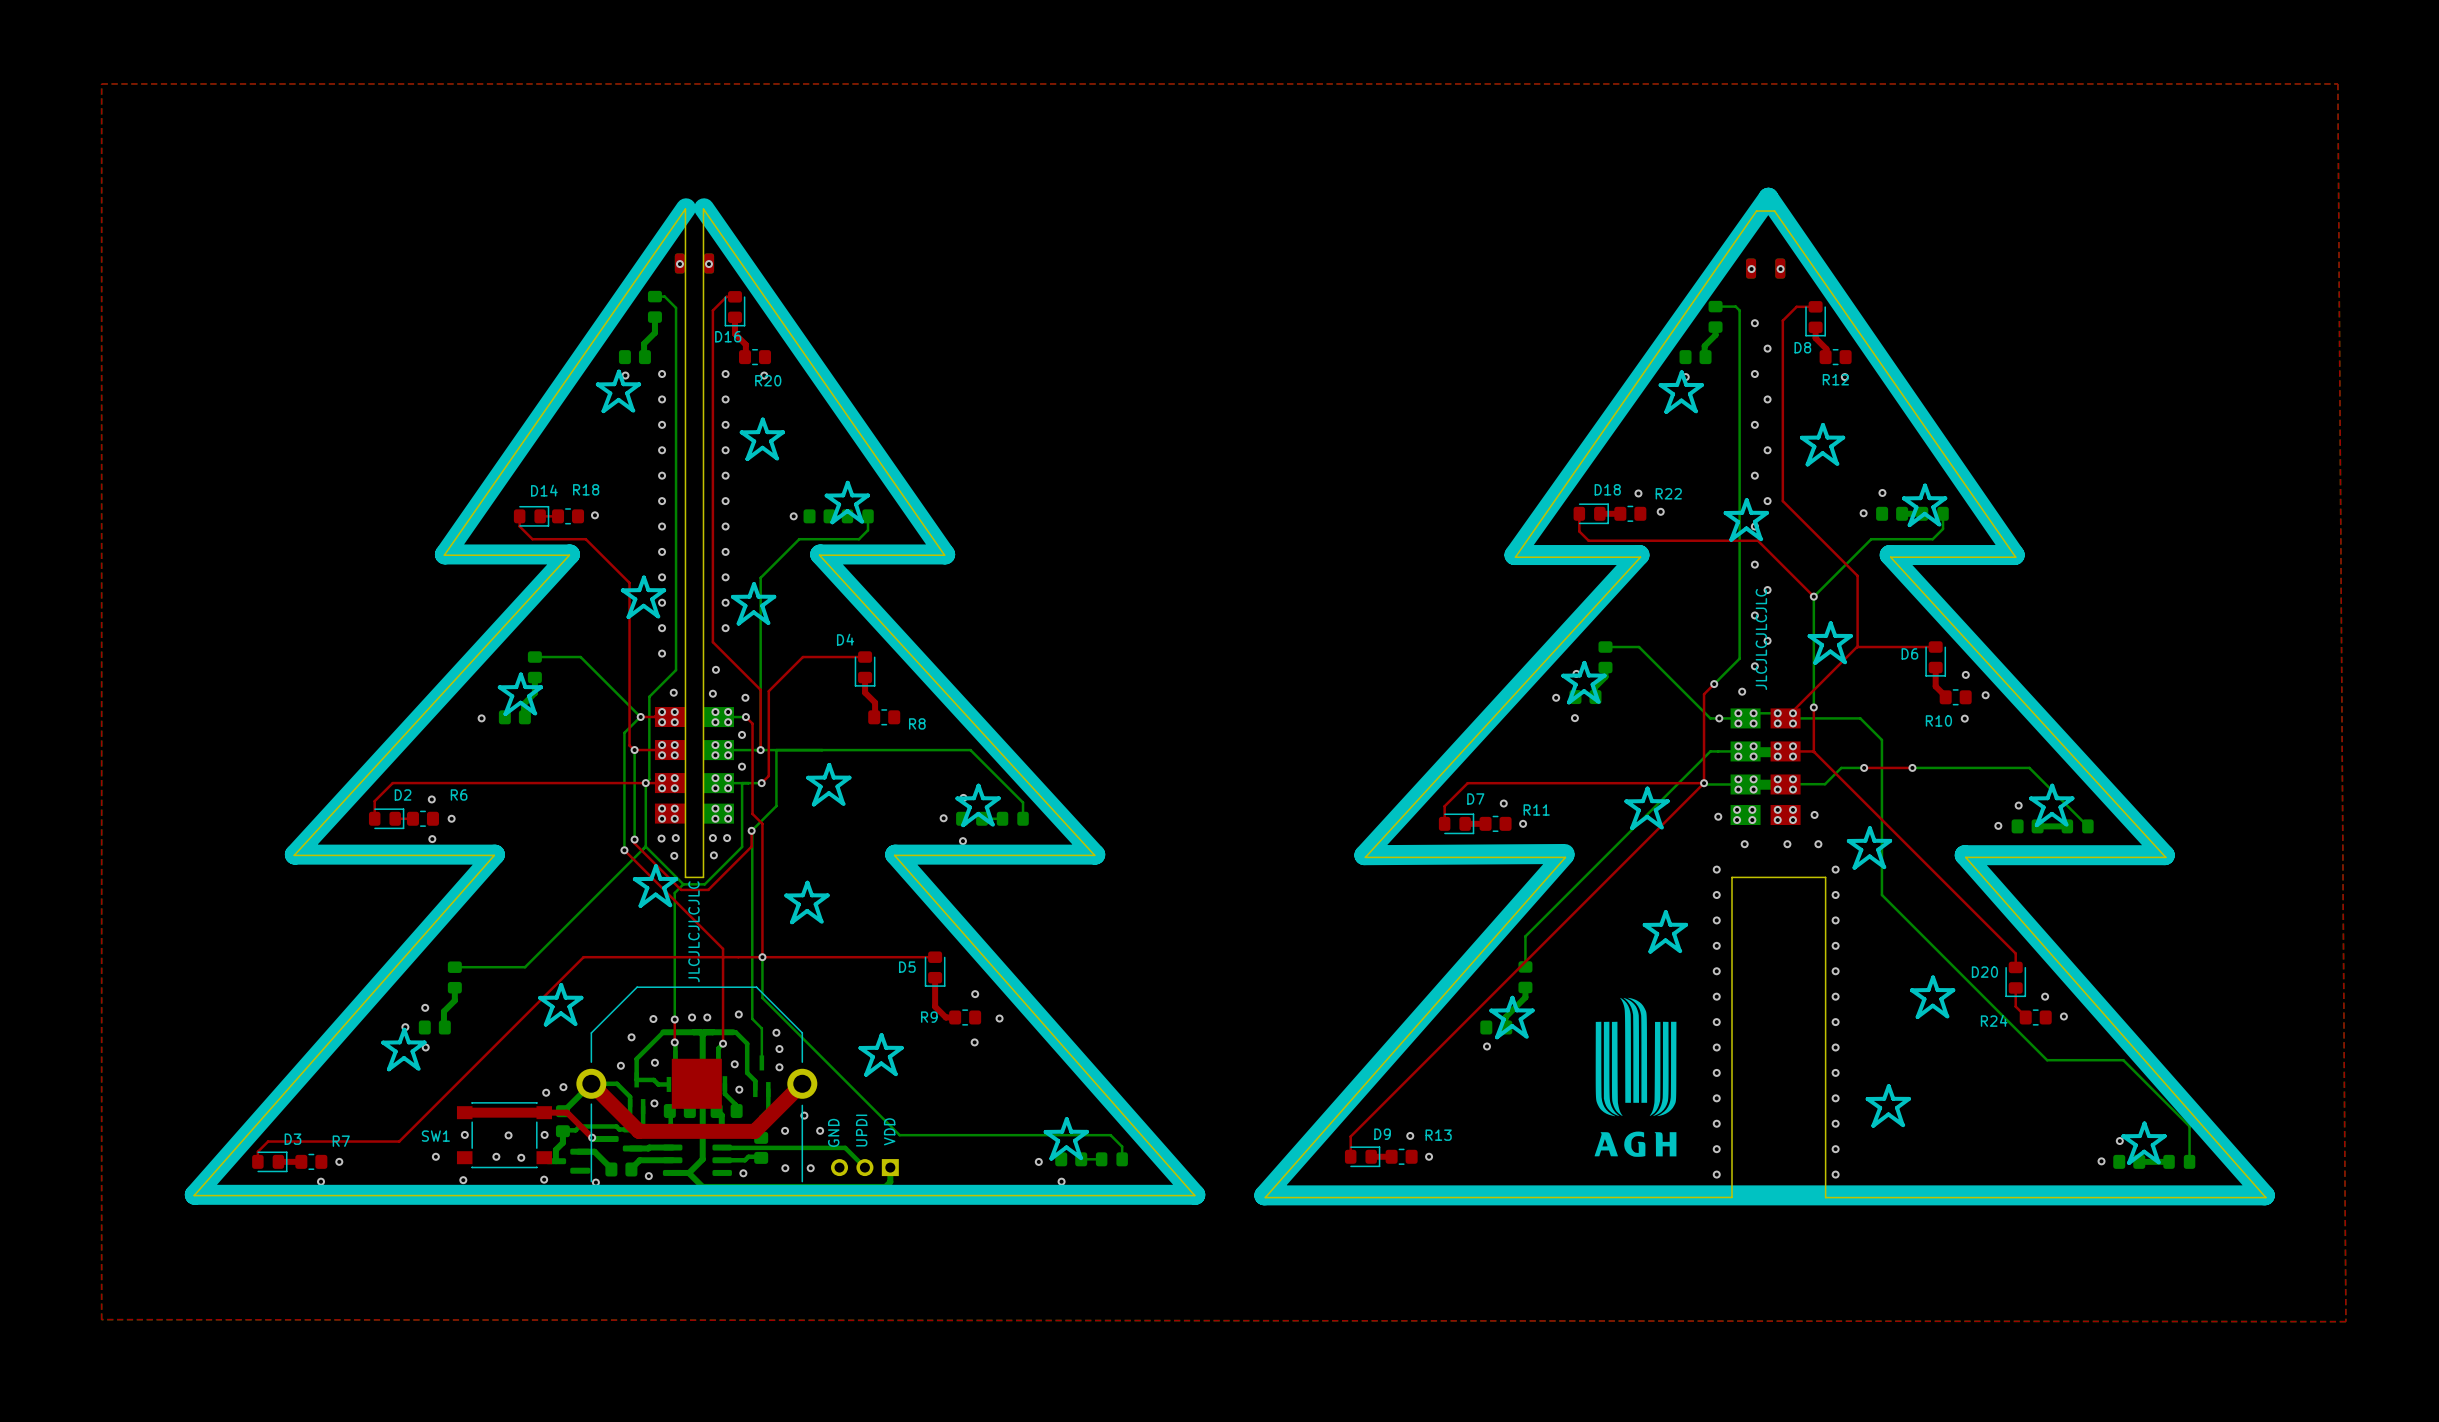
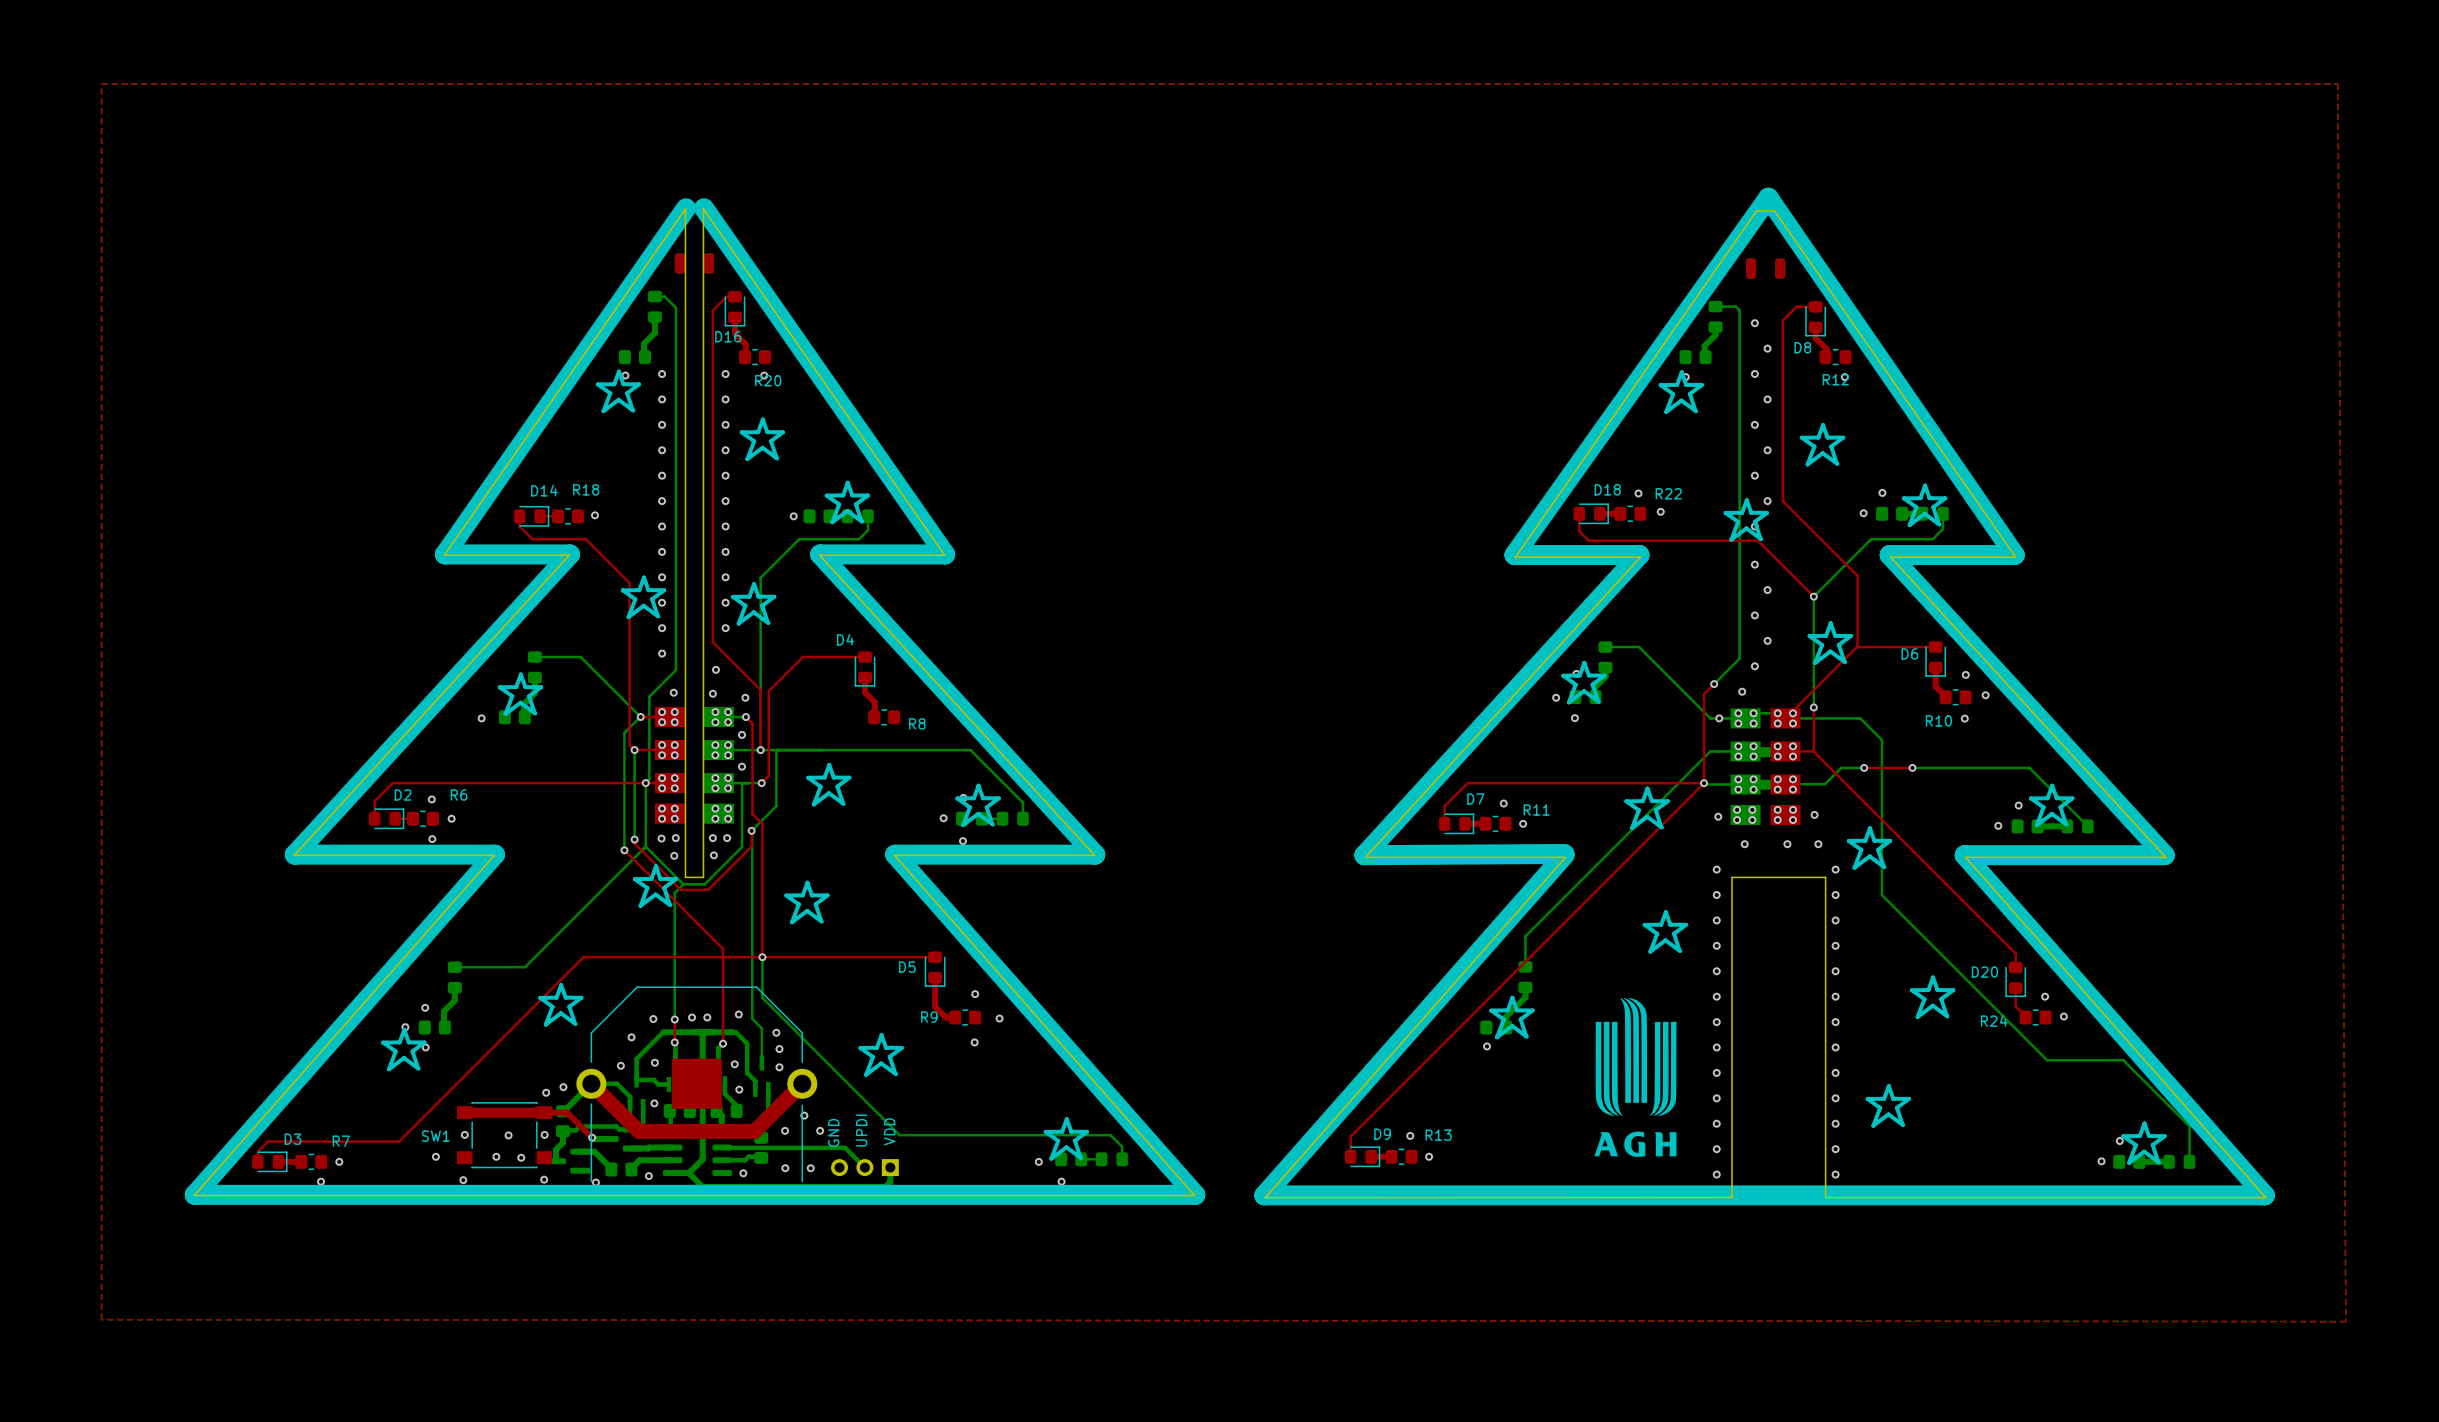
via: (679, 264) -> none
via: (708, 264) -> none
via: (1751, 269) -> none
via: (1780, 269) -> none
text: JLCJLCJLCJLC (1761, 639) -> none
text: JLCJLCJLCJLC (693, 931) -> none

